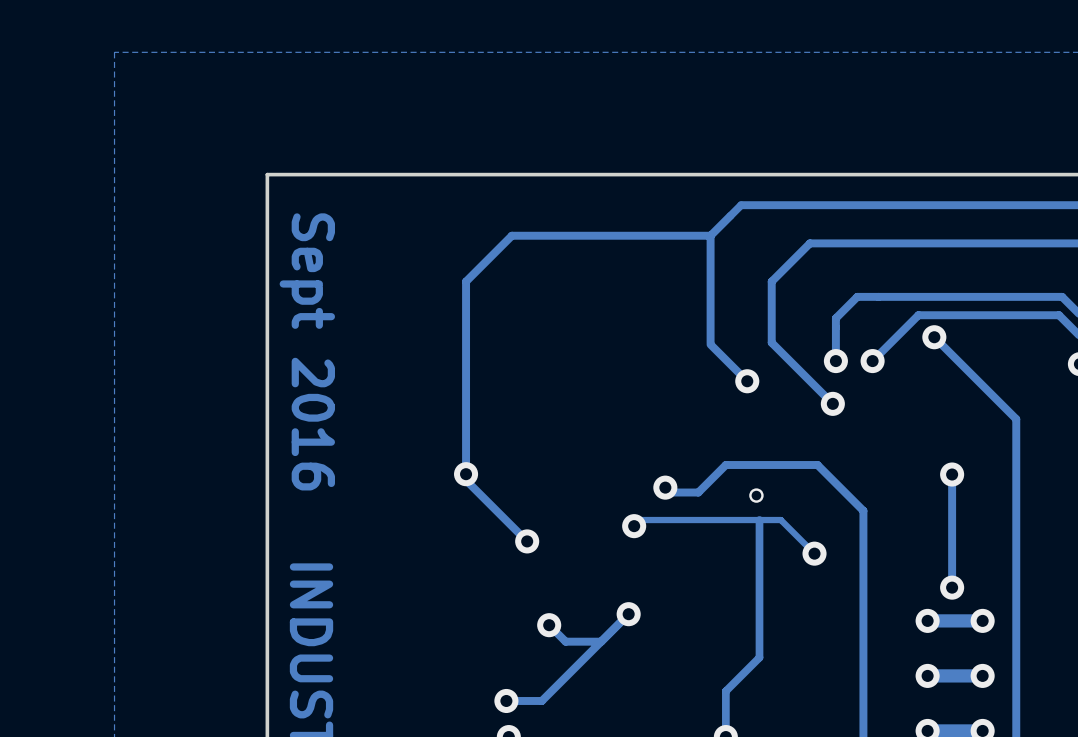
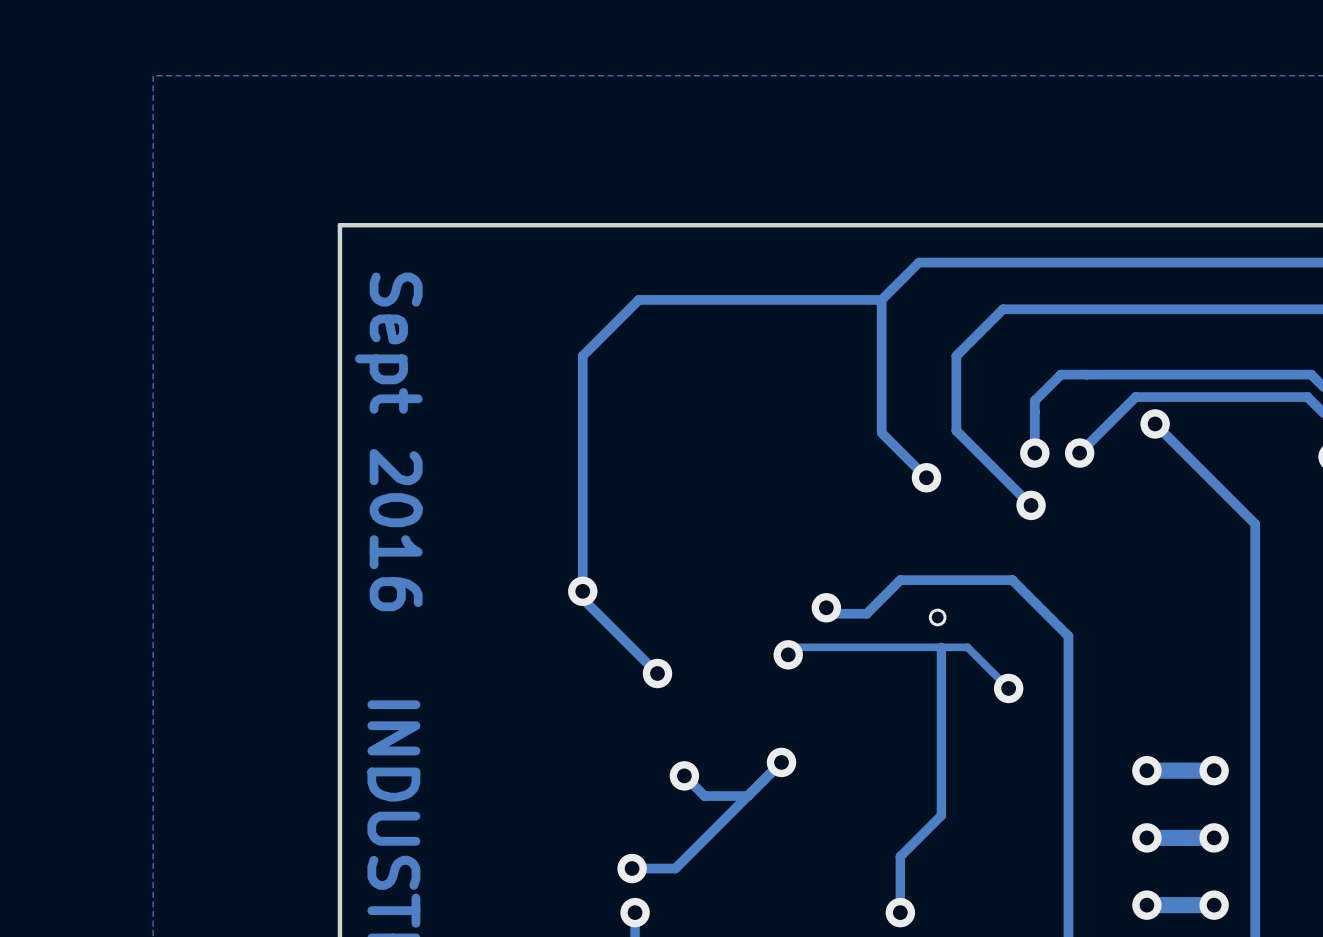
track: (952, 474) (952, 587) -> none
via: (952, 474) -> none
via: (952, 587) -> none

